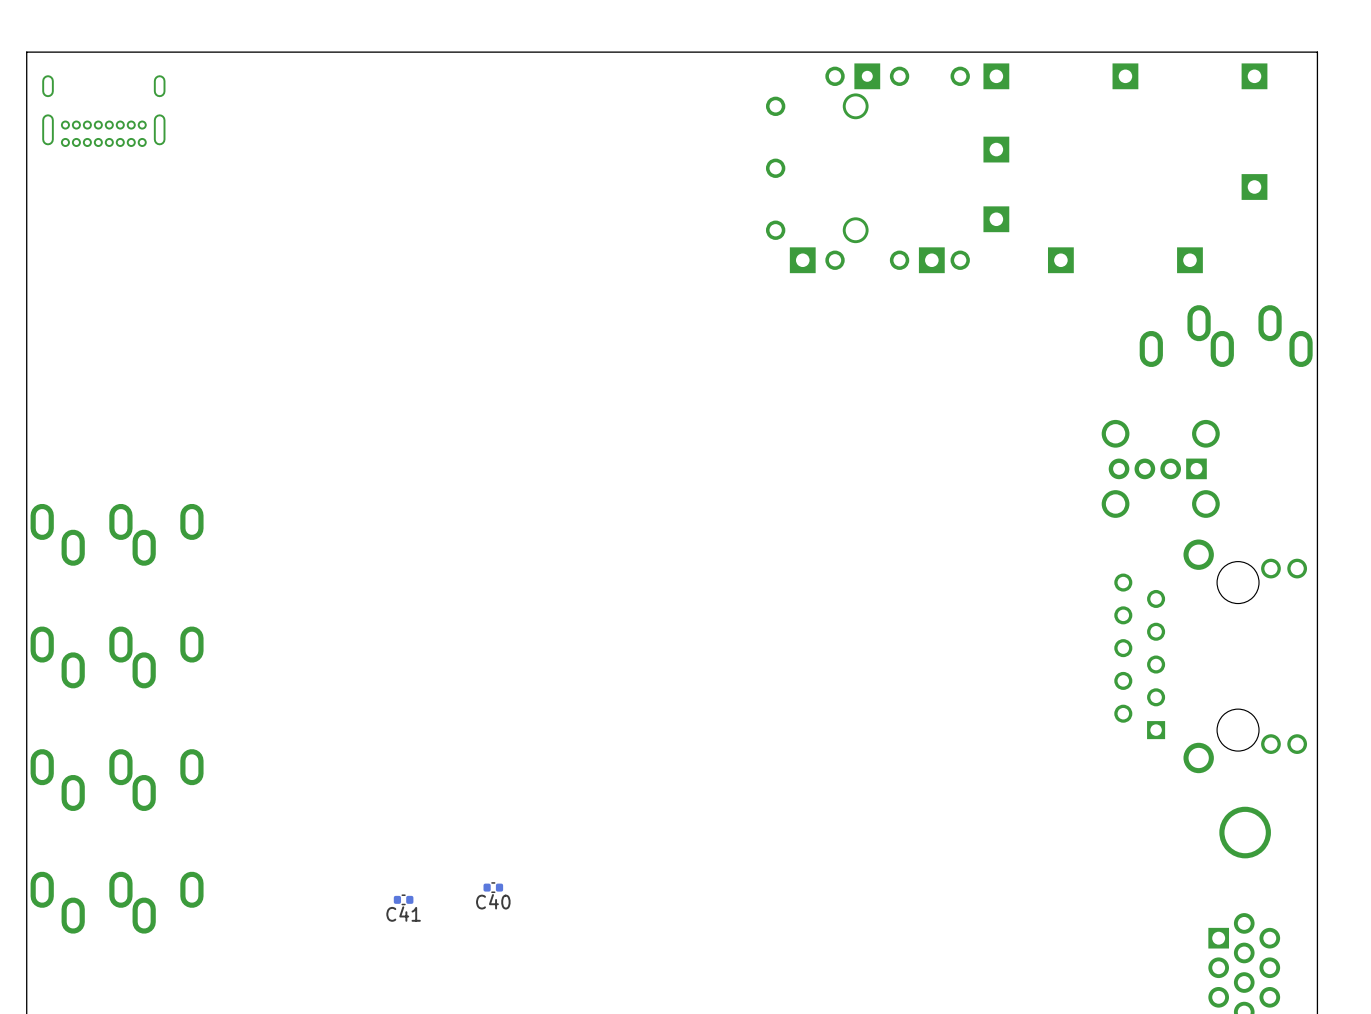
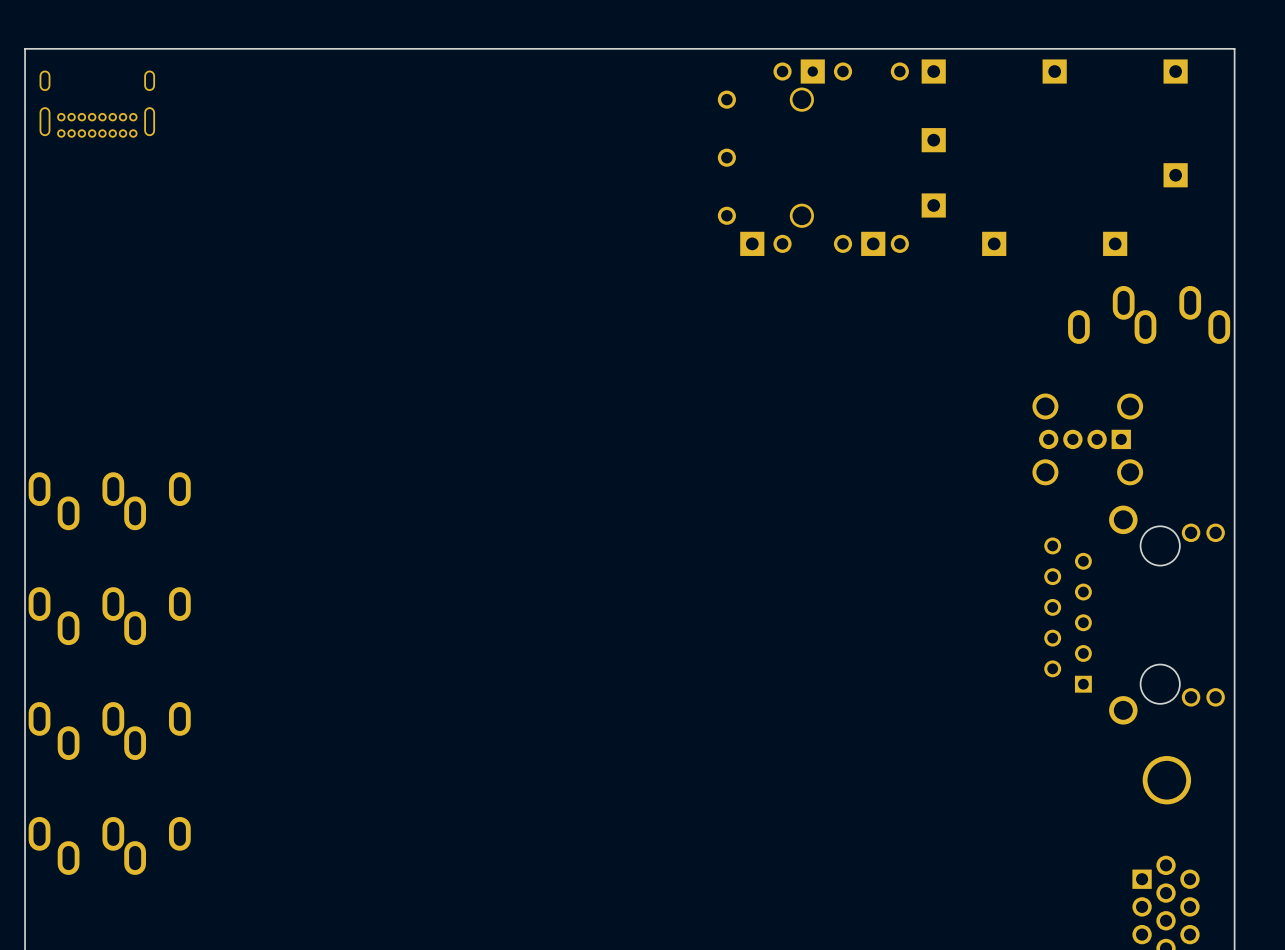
C40: (493, 887) -> none
C41: (403, 899) -> none

